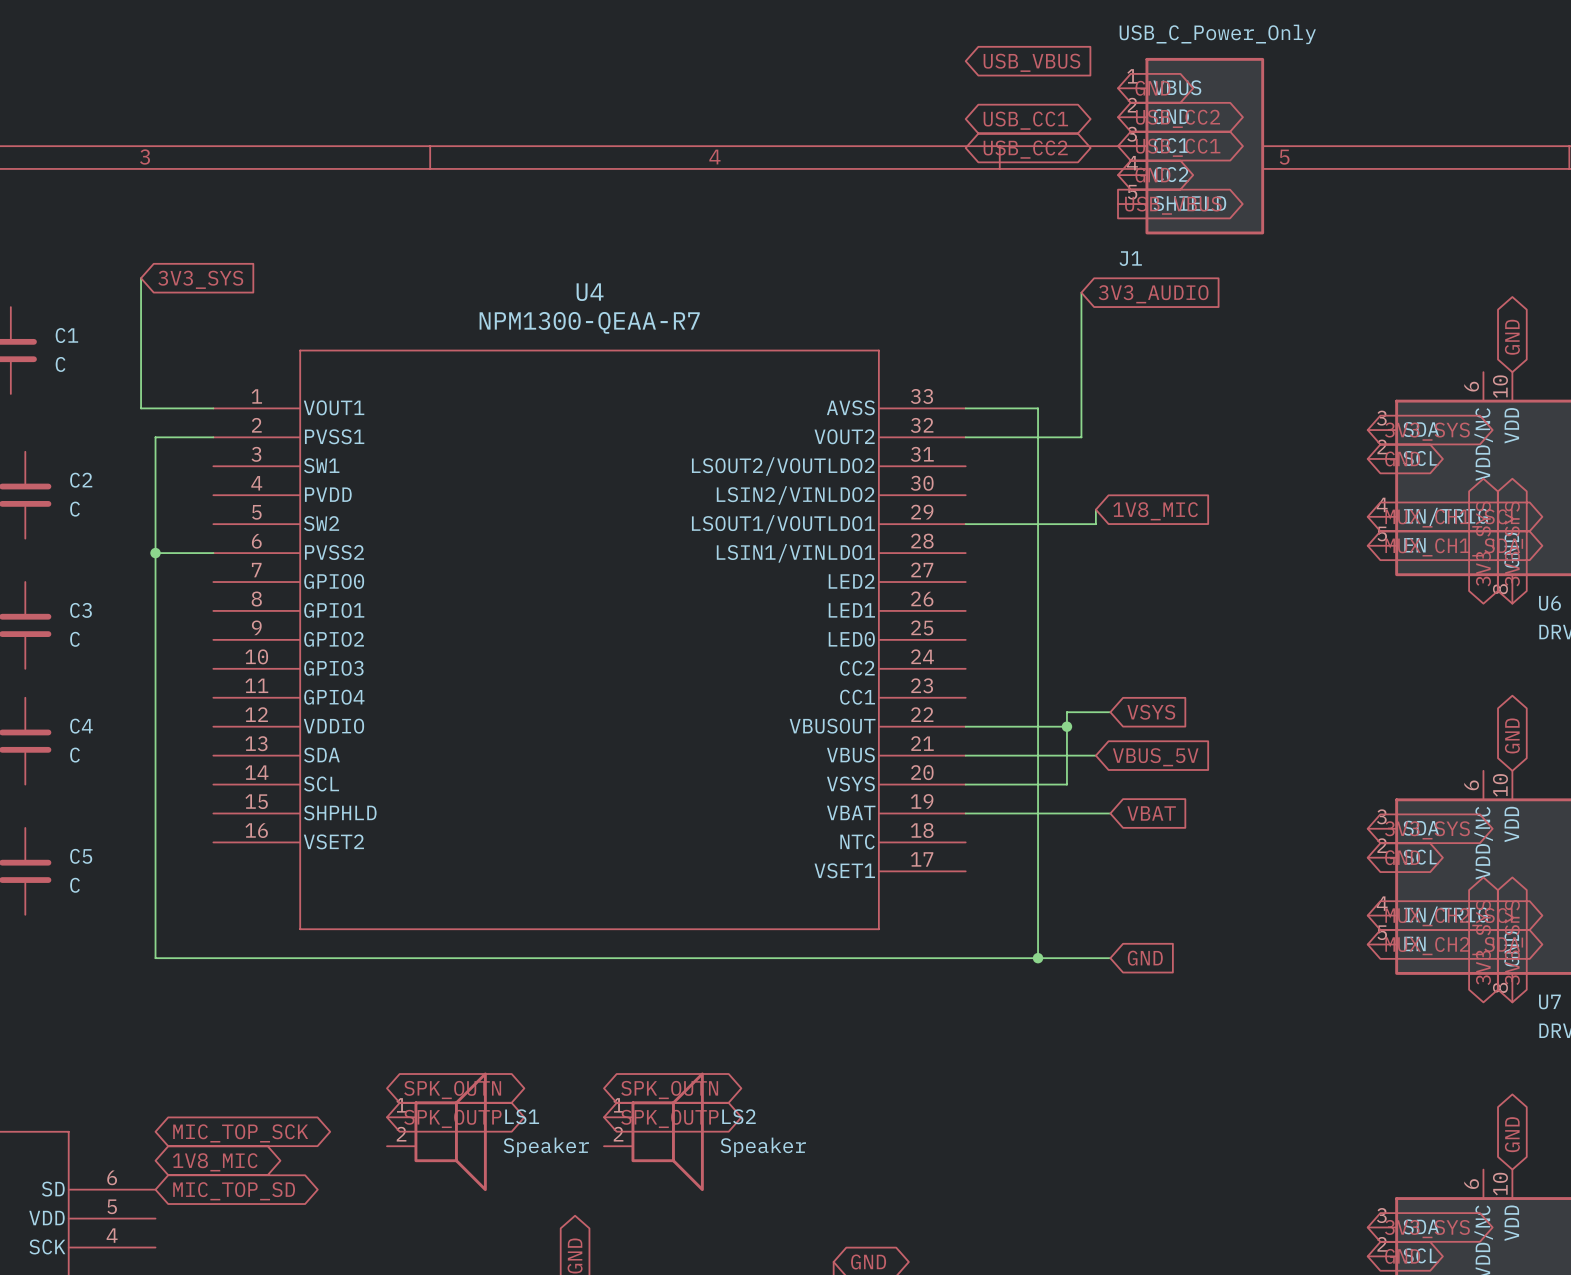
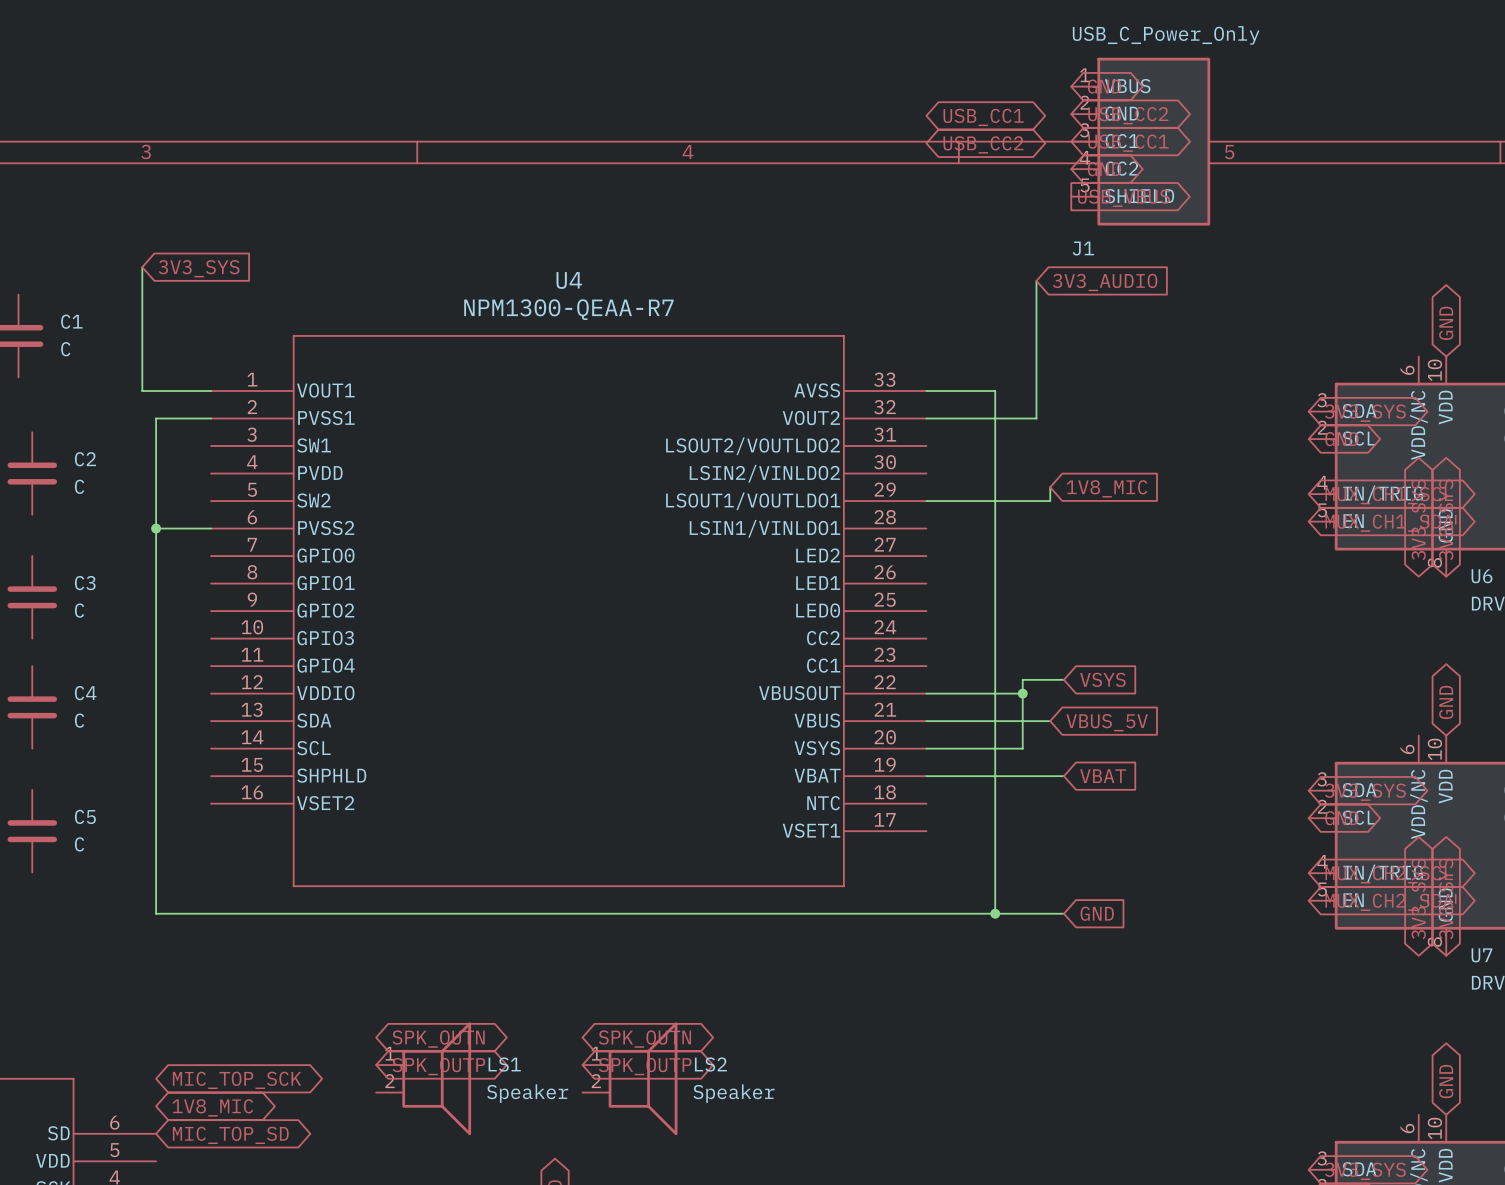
global label: USB_VBUS (1031, 62) -> none

